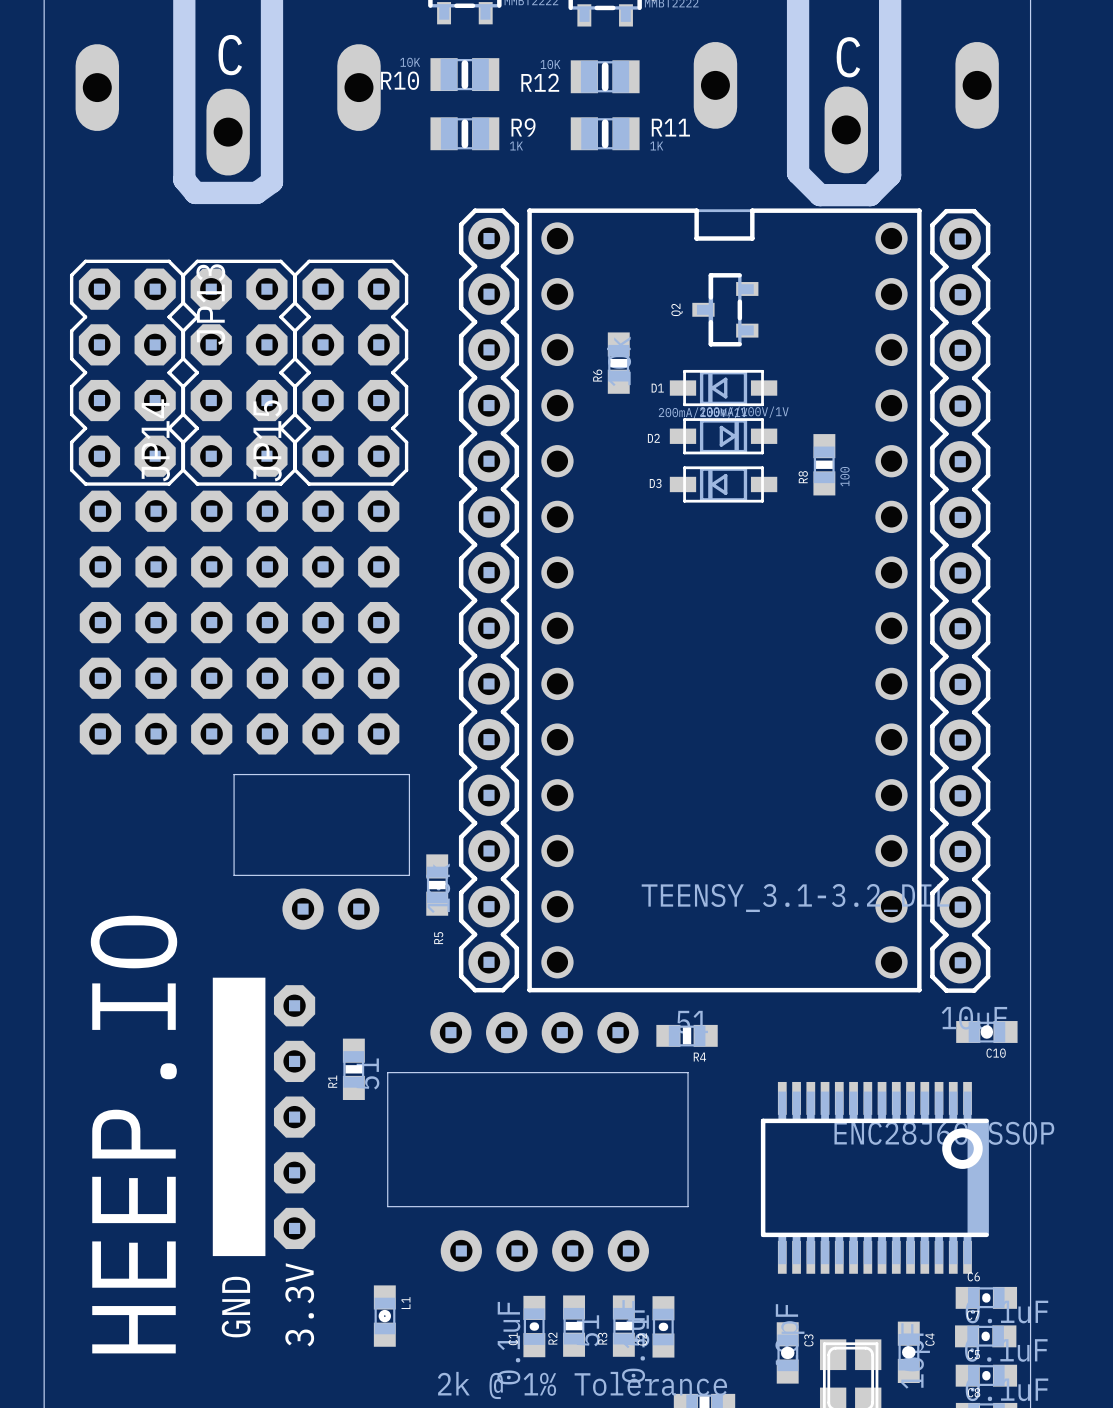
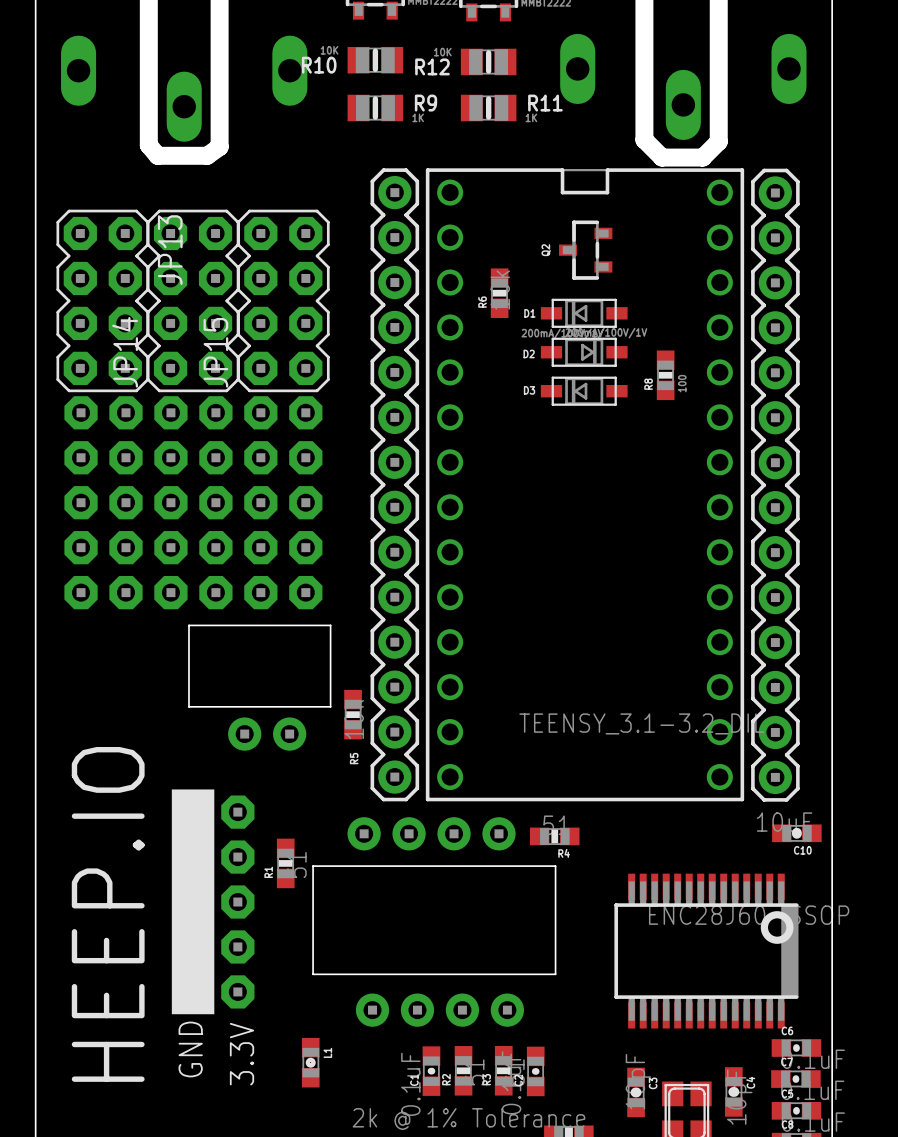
text: C (230, 55) -> none
text: C (848, 57) -> none

